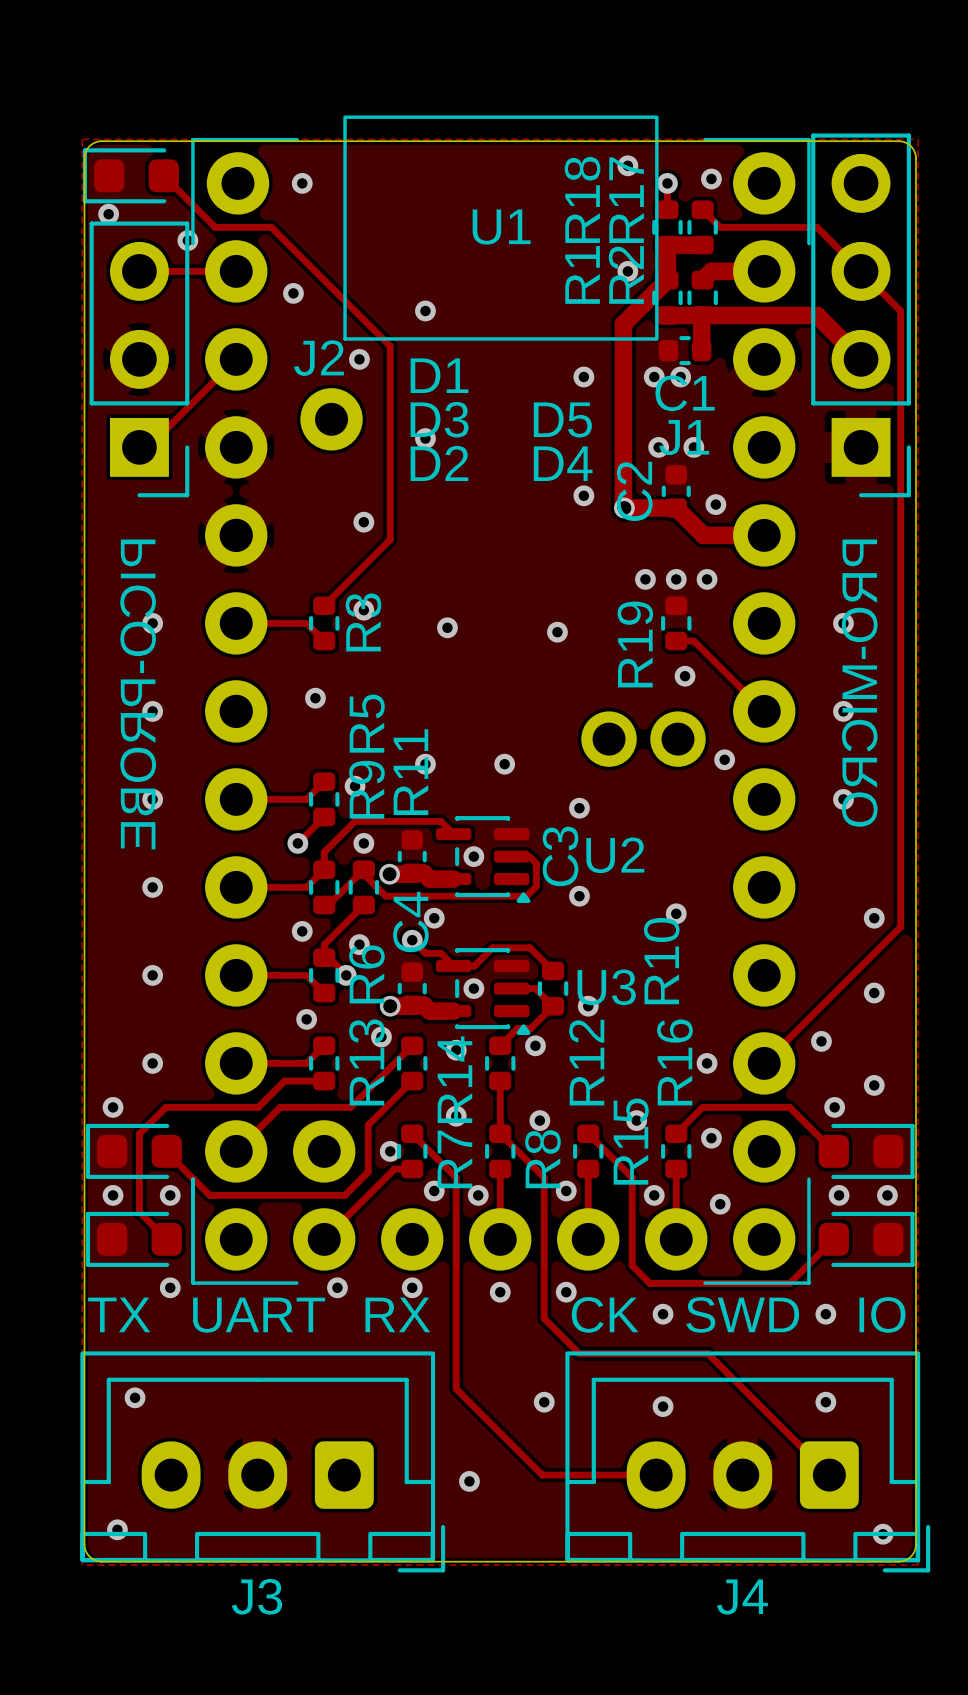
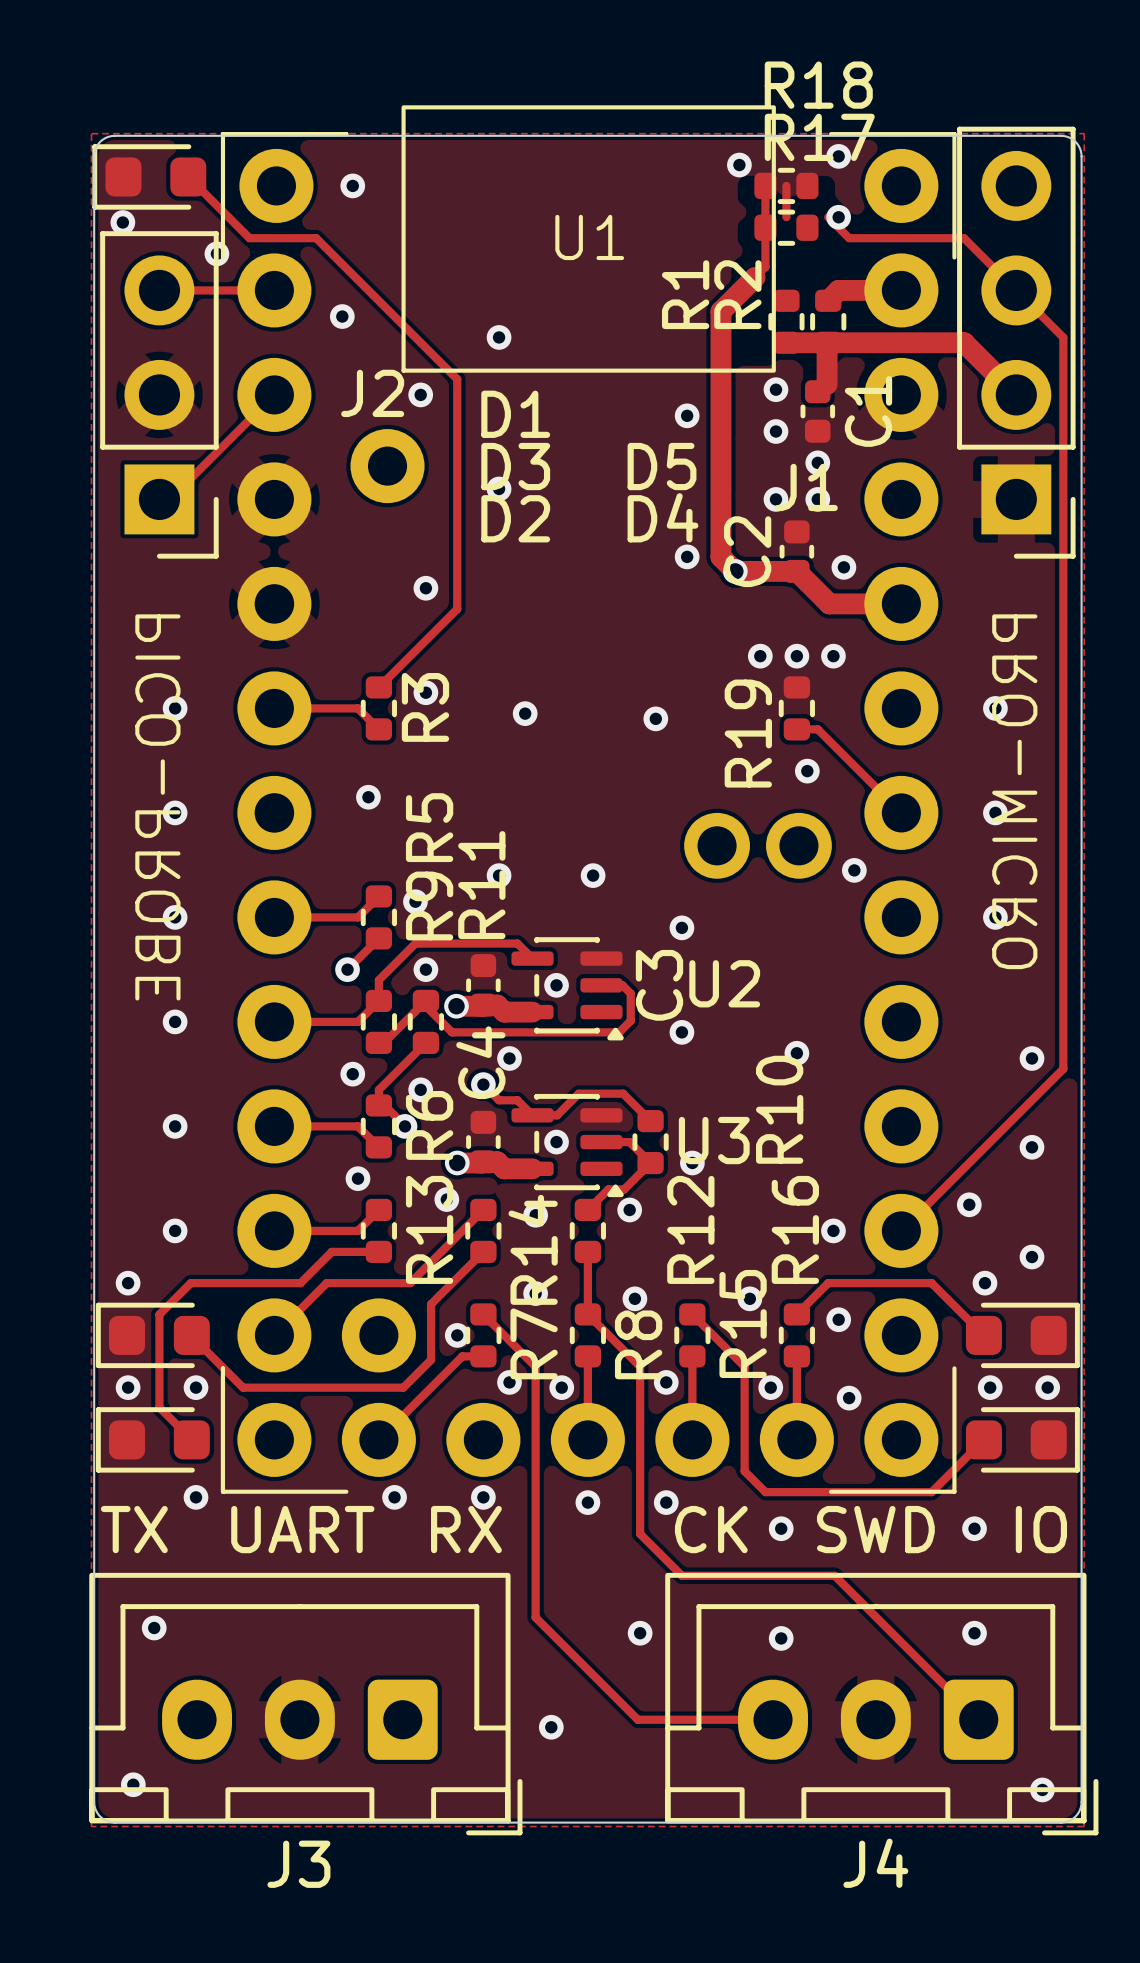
via position: (711, 178) -> (838, 156)
via: (667, 183) -> none
via: none -> (838, 217)
R18 rotation: 0° (667, 227) -> 90° clockwise (786, 185)
R18 position: (667, 227) -> (786, 185)
R17 rotation: 0° (702, 227) -> 90° clockwise (786, 227)
R17 position: (702, 227) -> (786, 227)
track: (702, 245) (667, 245) (667, 280) (623, 324) (623, 507) -> (765, 185) (765, 267) (720, 311) (720, 557) (735, 571)
via: (627, 271) -> none
C1 rotation: 0° (685, 350) -> 90° clockwise (817, 411)
via: none -> (775, 389)
via position: (654, 376) -> (775, 431)
via: (680, 376) -> none
via: none -> (817, 462)

